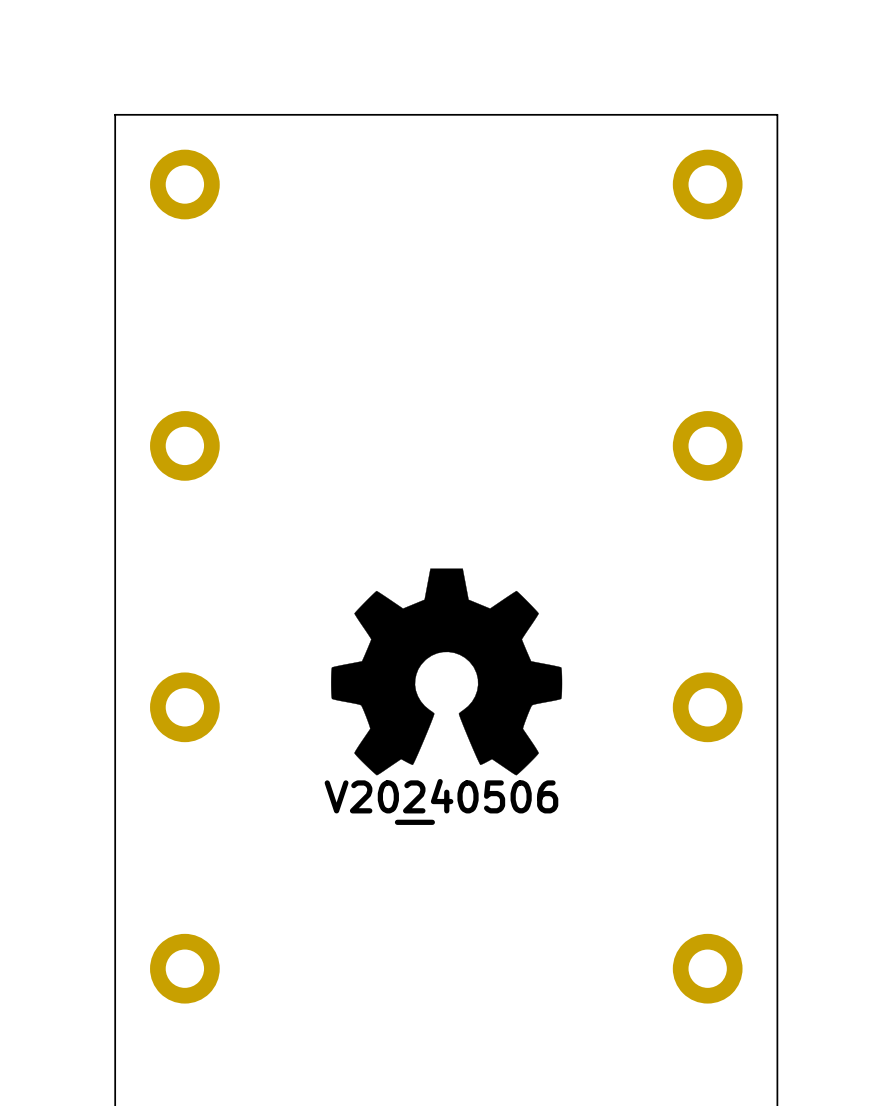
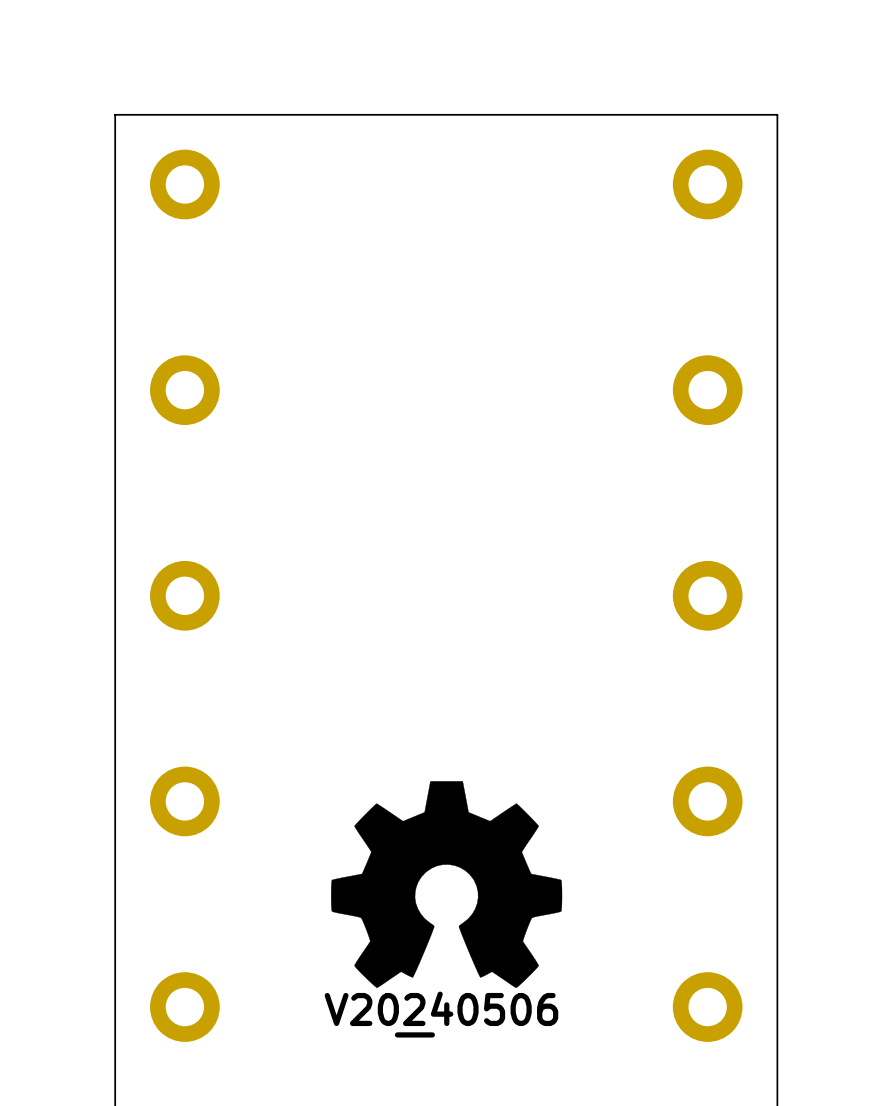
part position: (184, 445) -> (184, 390)
part position: (707, 445) -> (707, 390)
part: none -> (184, 595)
part: none -> (707, 595)
drawing position: (446, 671) -> (446, 884)
part: (184, 707) -> none
part: (707, 707) -> none
part: none -> (184, 801)
part: none -> (707, 801)
drawing position: (414, 822) -> (414, 1034)
part position: (184, 968) -> (184, 1007)
part position: (707, 968) -> (707, 1007)

